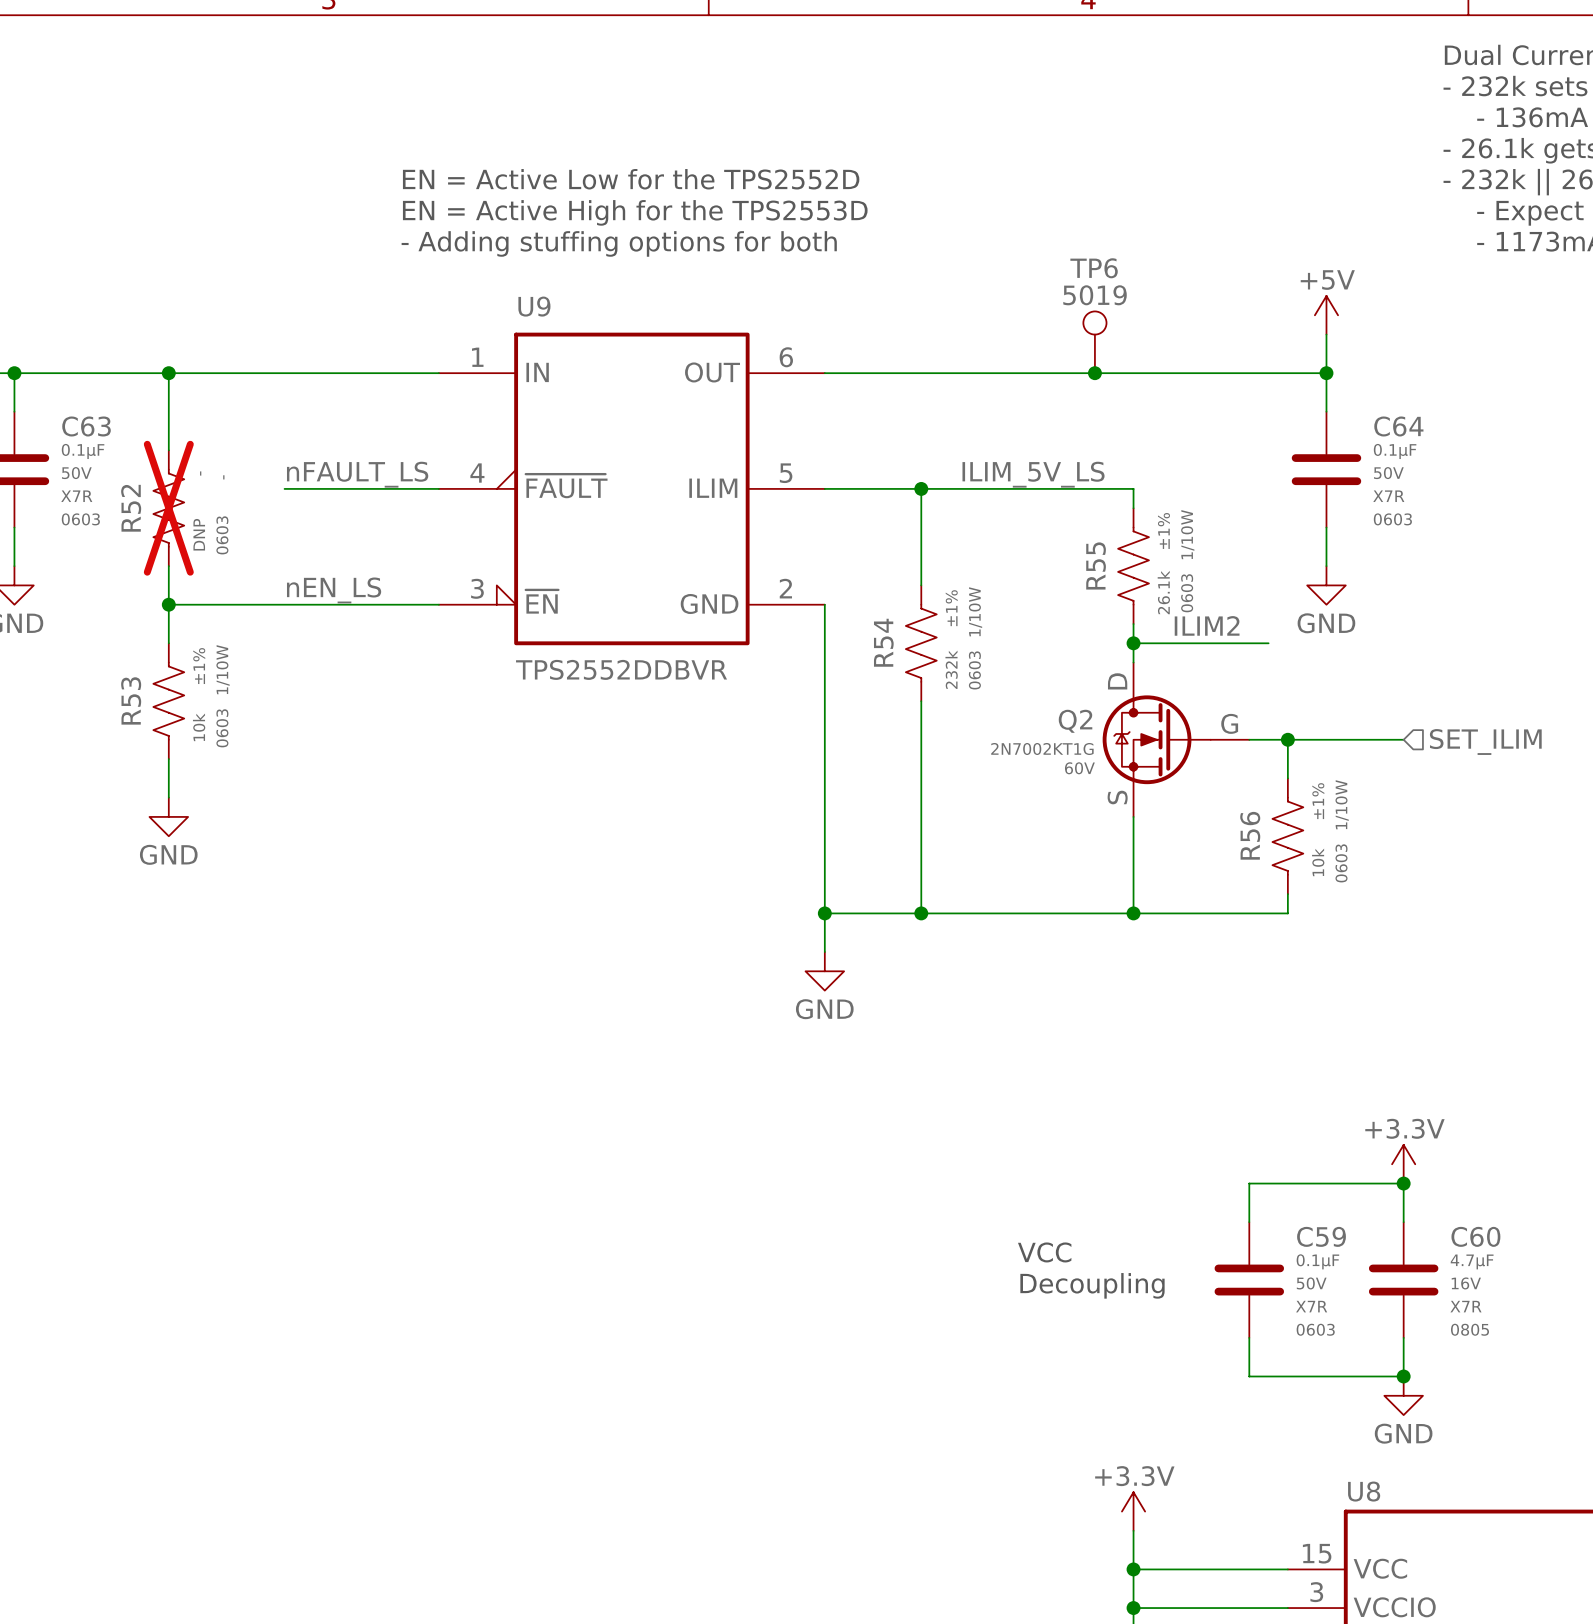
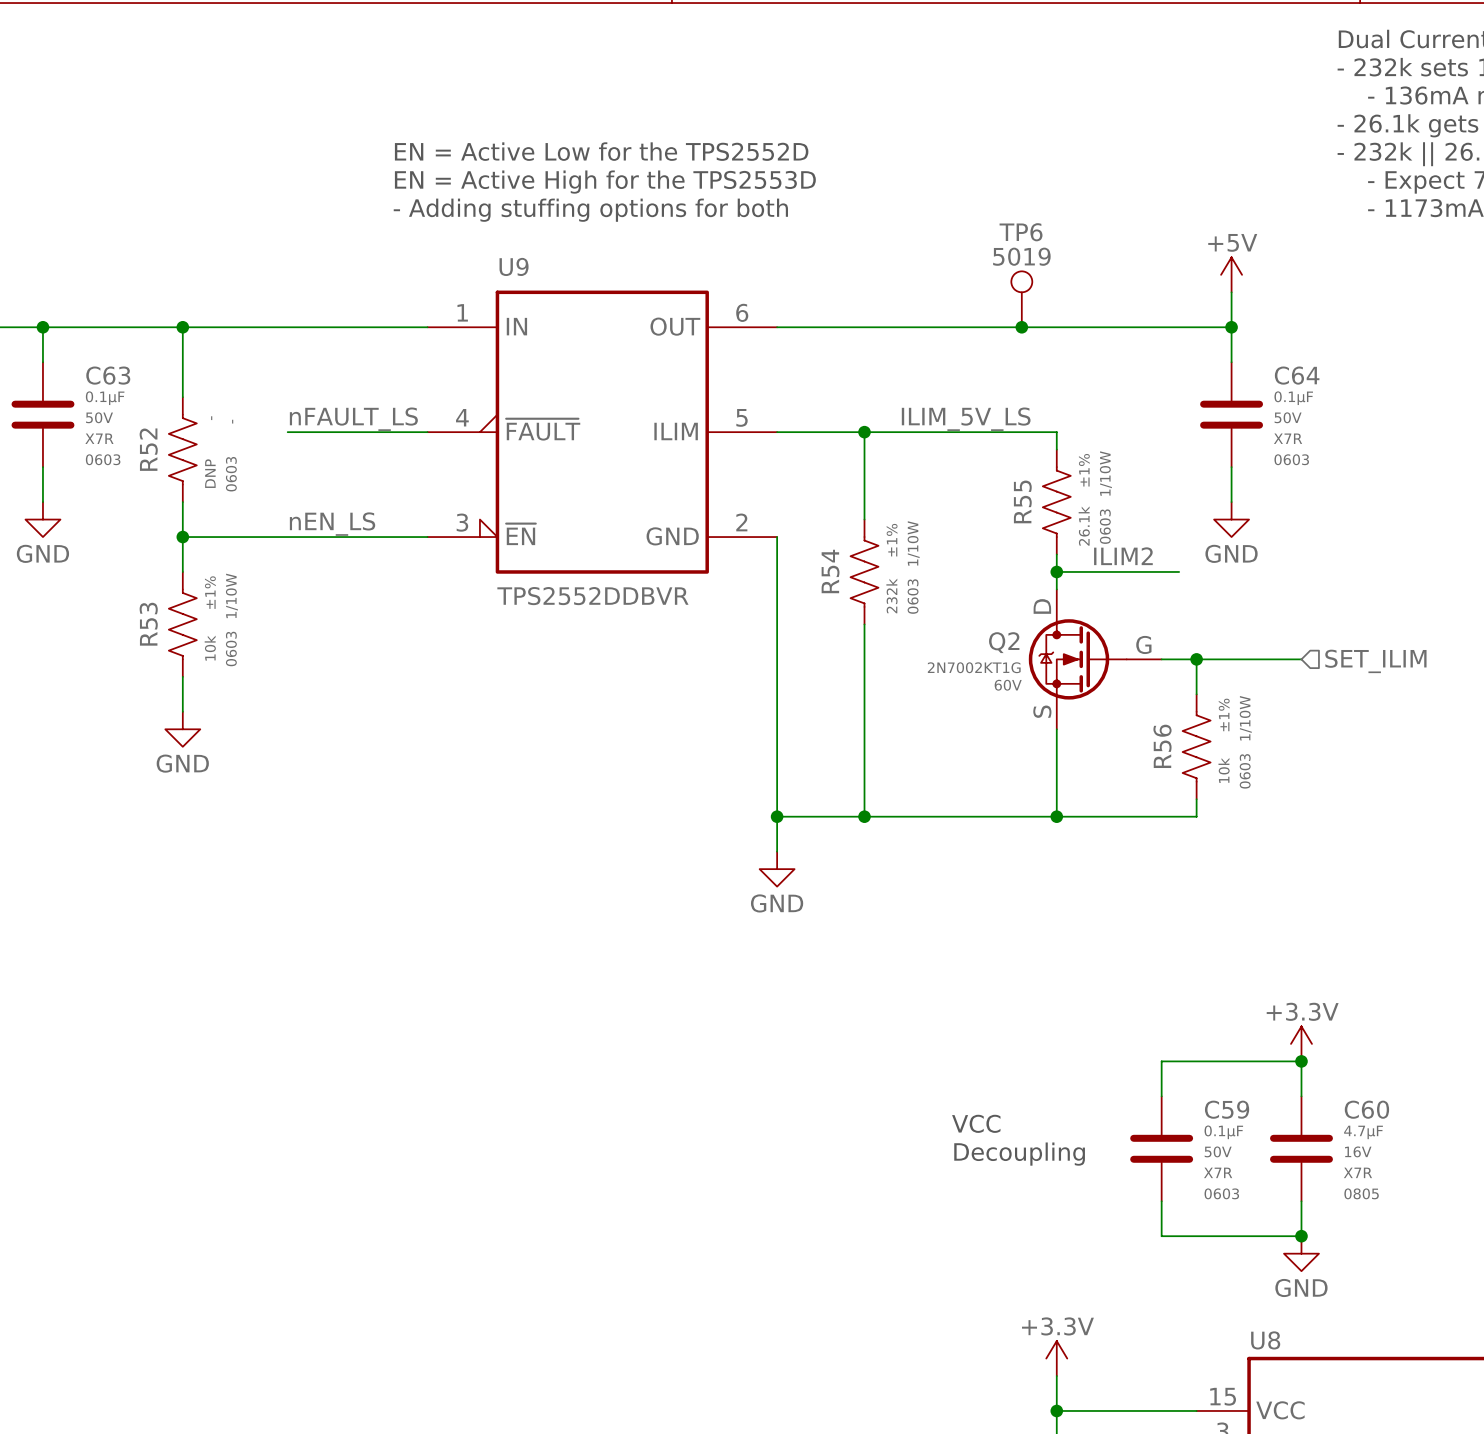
R52 do-not-place cross: (168, 508) -> none

